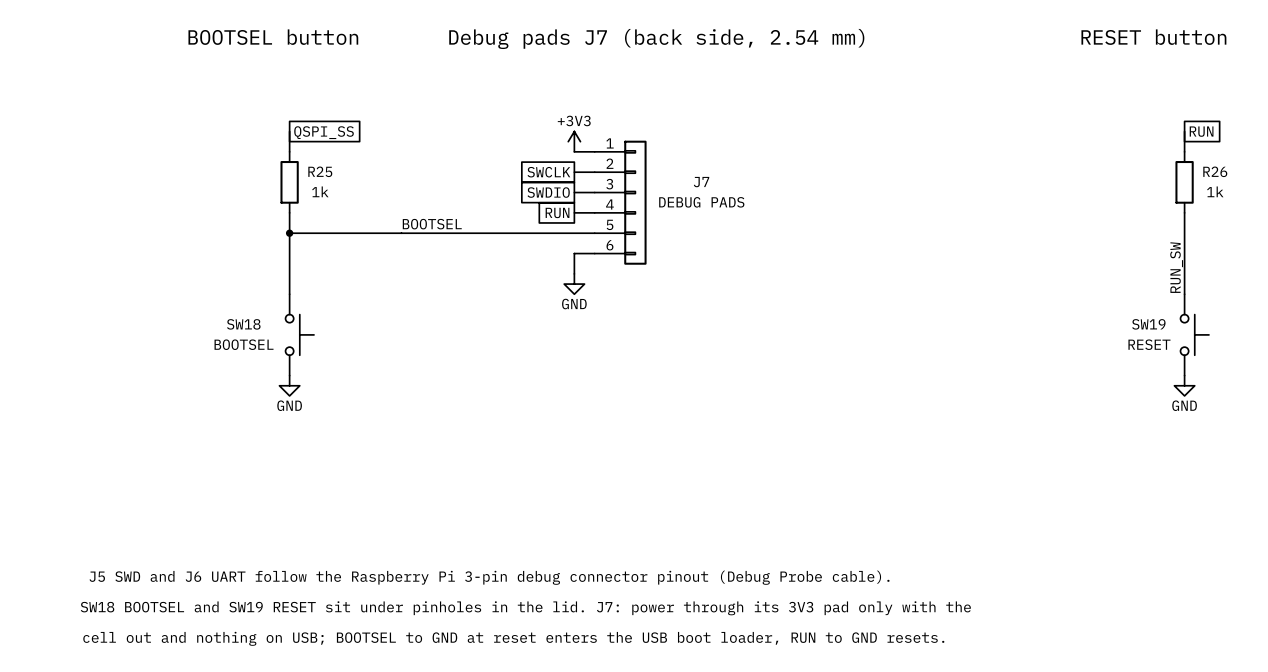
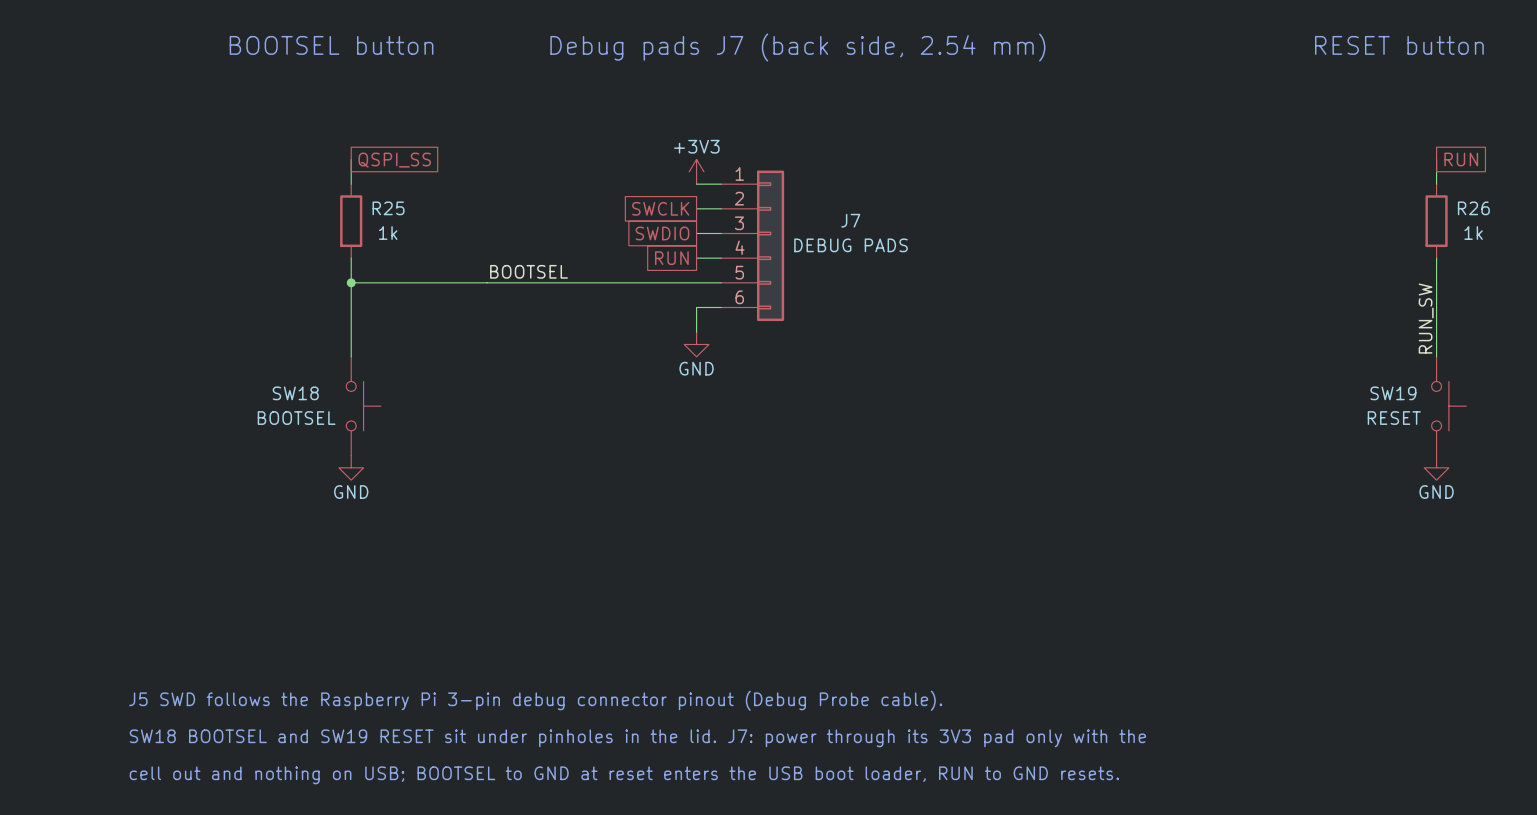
text: J5 SWD and J6 UART follow the Raspberry Pi 3-pin debug connector pinout (Debug Probe cable). (489, 577) -> J5 SWD follows the Raspberry Pi 3-pin debug connector pinout (Debug Probe cable). (535, 700)

